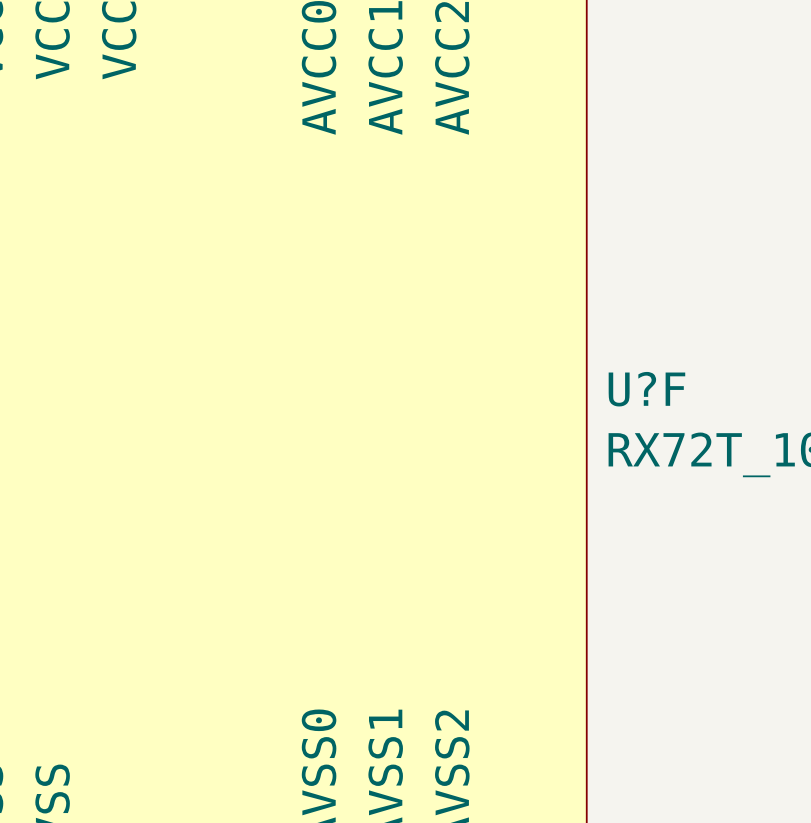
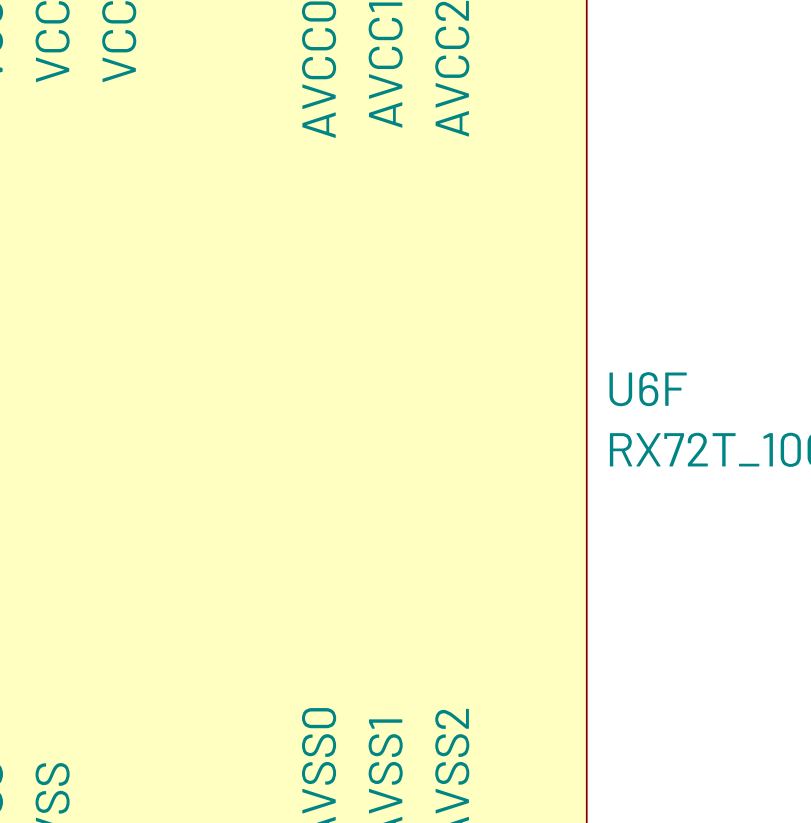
U?F name: U?F (646, 389) -> U6F (648, 389)

